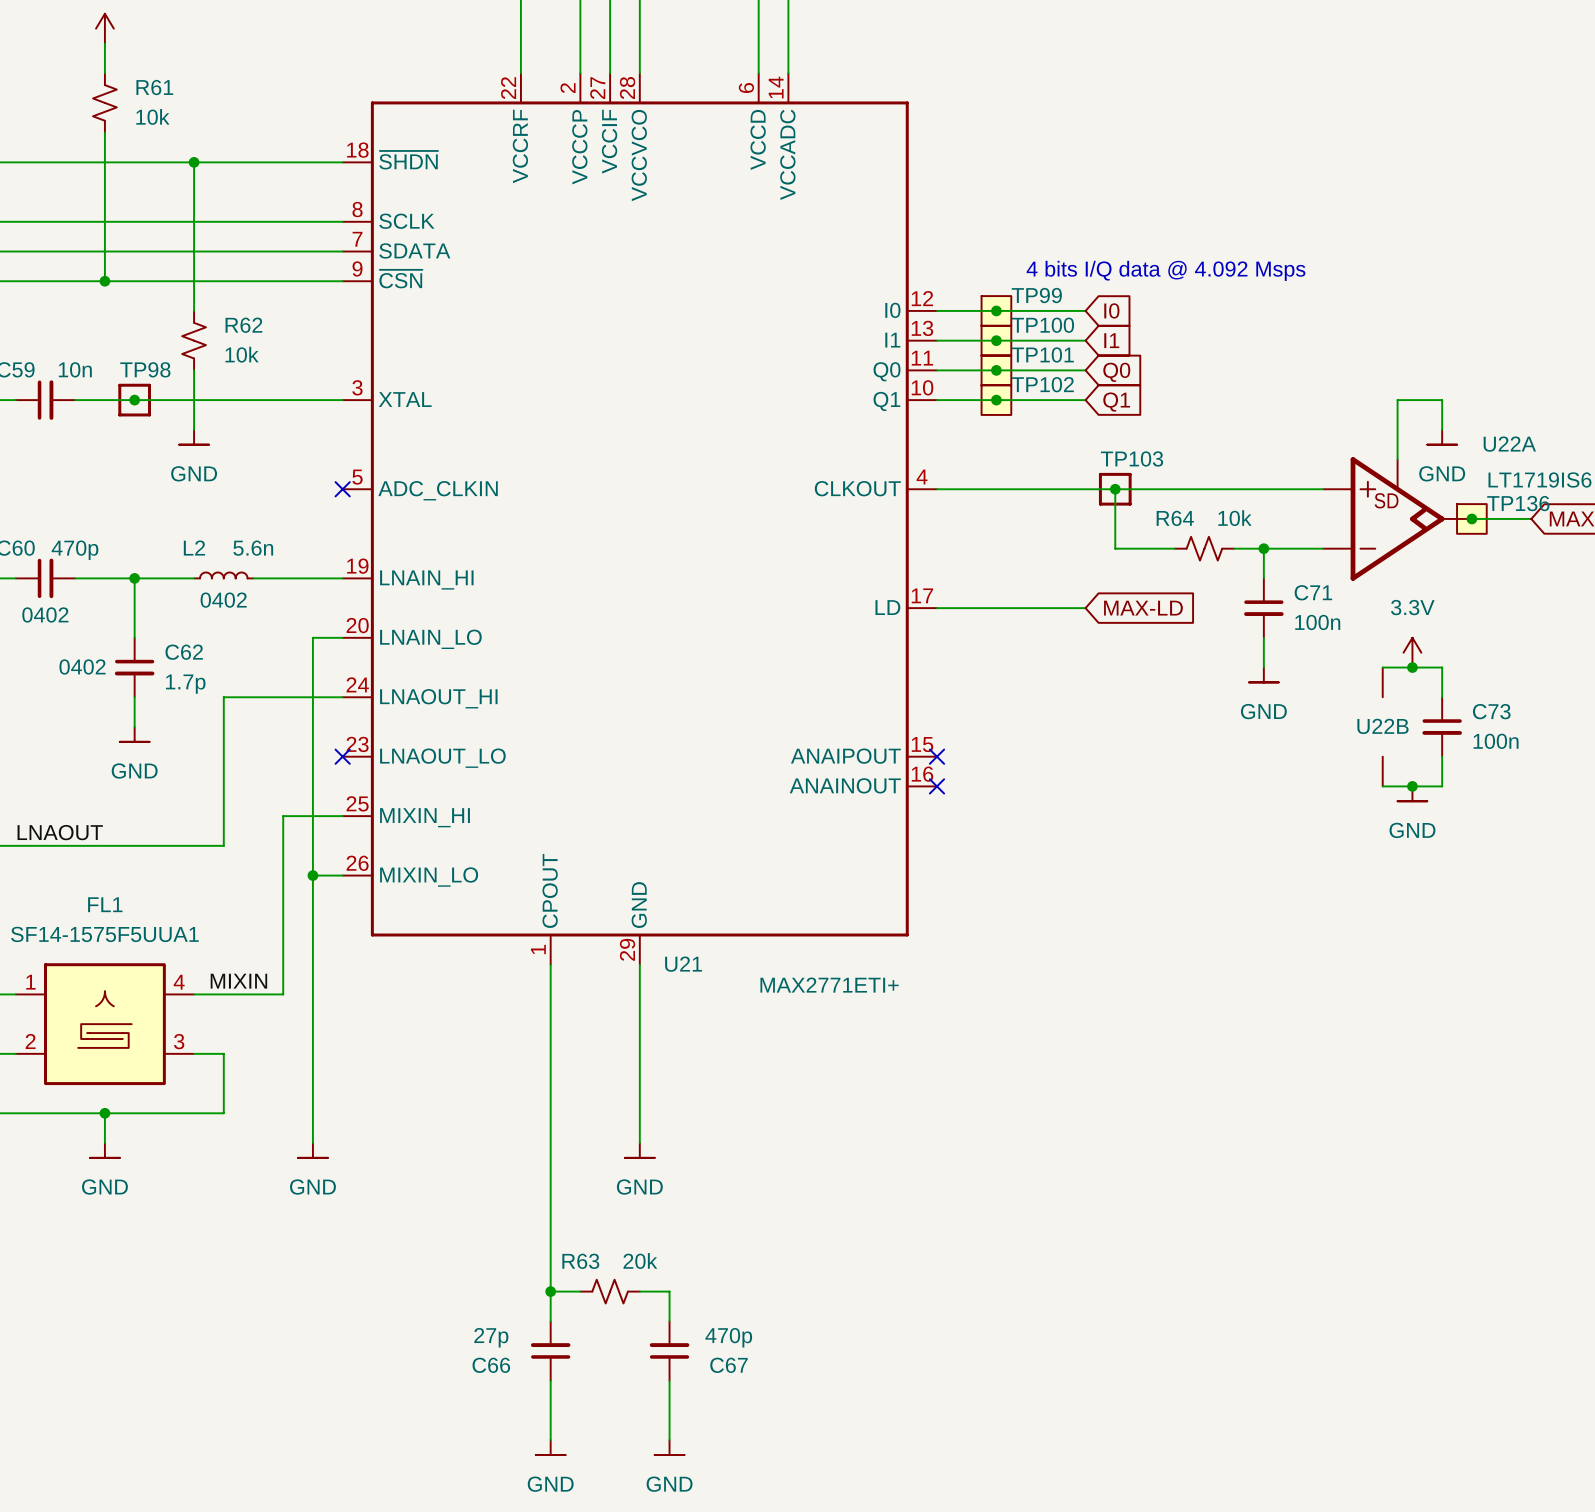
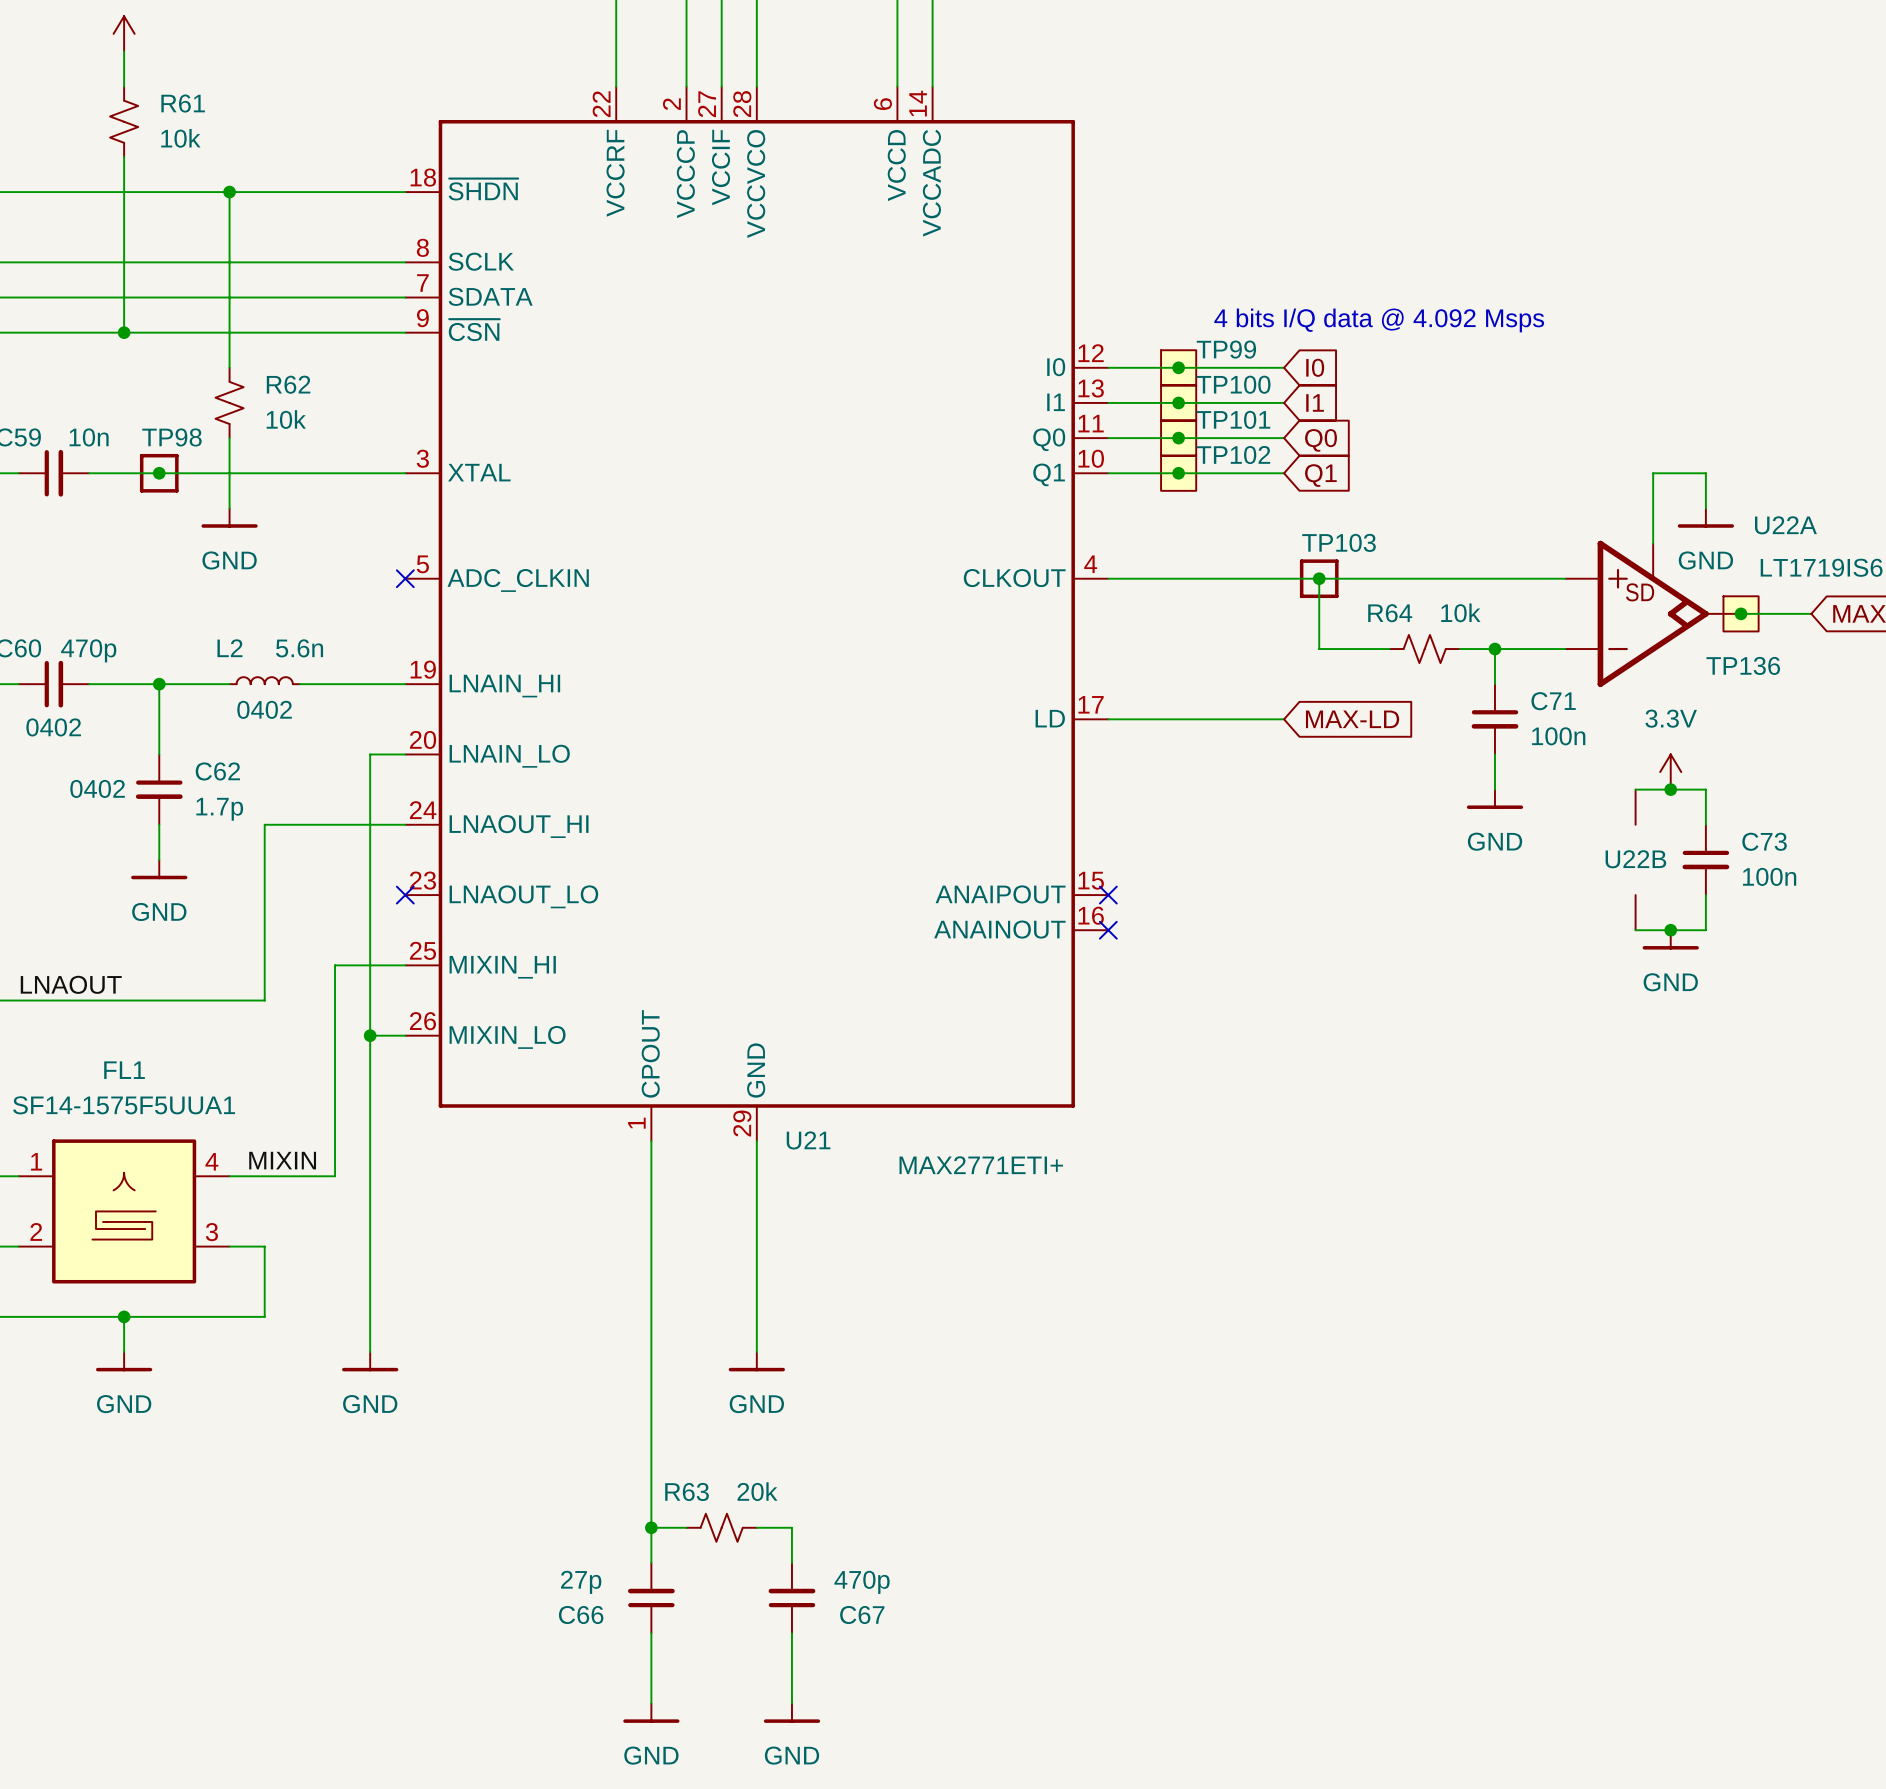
power symbol shape: [179, 429, 209, 445] -> [201, 508, 258, 528]
power symbol shape: [1427, 429, 1458, 445] -> [1677, 508, 1735, 528]
TP136 name position: TP136 (1518, 503) -> TP136 (1743, 665)
power symbol shape: [1249, 667, 1279, 683] -> [1466, 789, 1524, 809]
power symbol shape: [119, 726, 150, 742] -> [131, 859, 188, 880]
power symbol shape: [1397, 786, 1428, 802] -> [1642, 930, 1699, 950]
power symbol shape: [90, 1143, 120, 1158] -> [96, 1352, 153, 1372]
power symbol shape: [298, 1143, 328, 1158] -> [342, 1352, 399, 1372]
power symbol shape: [624, 1143, 655, 1158] -> [728, 1352, 785, 1372]
power symbol shape: [535, 1440, 566, 1456] -> [623, 1703, 680, 1723]
power symbol shape: [654, 1440, 685, 1456] -> [763, 1703, 821, 1723]

